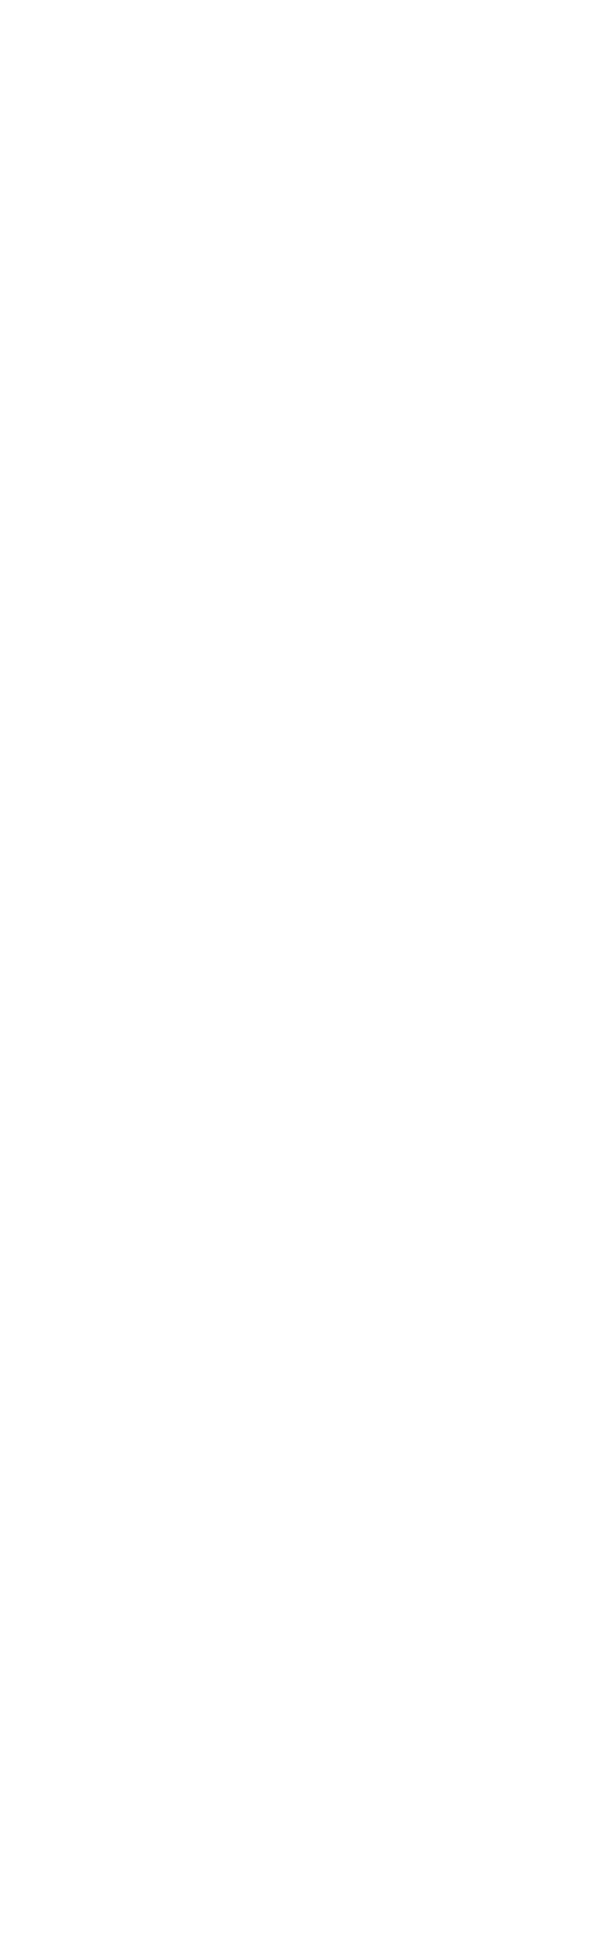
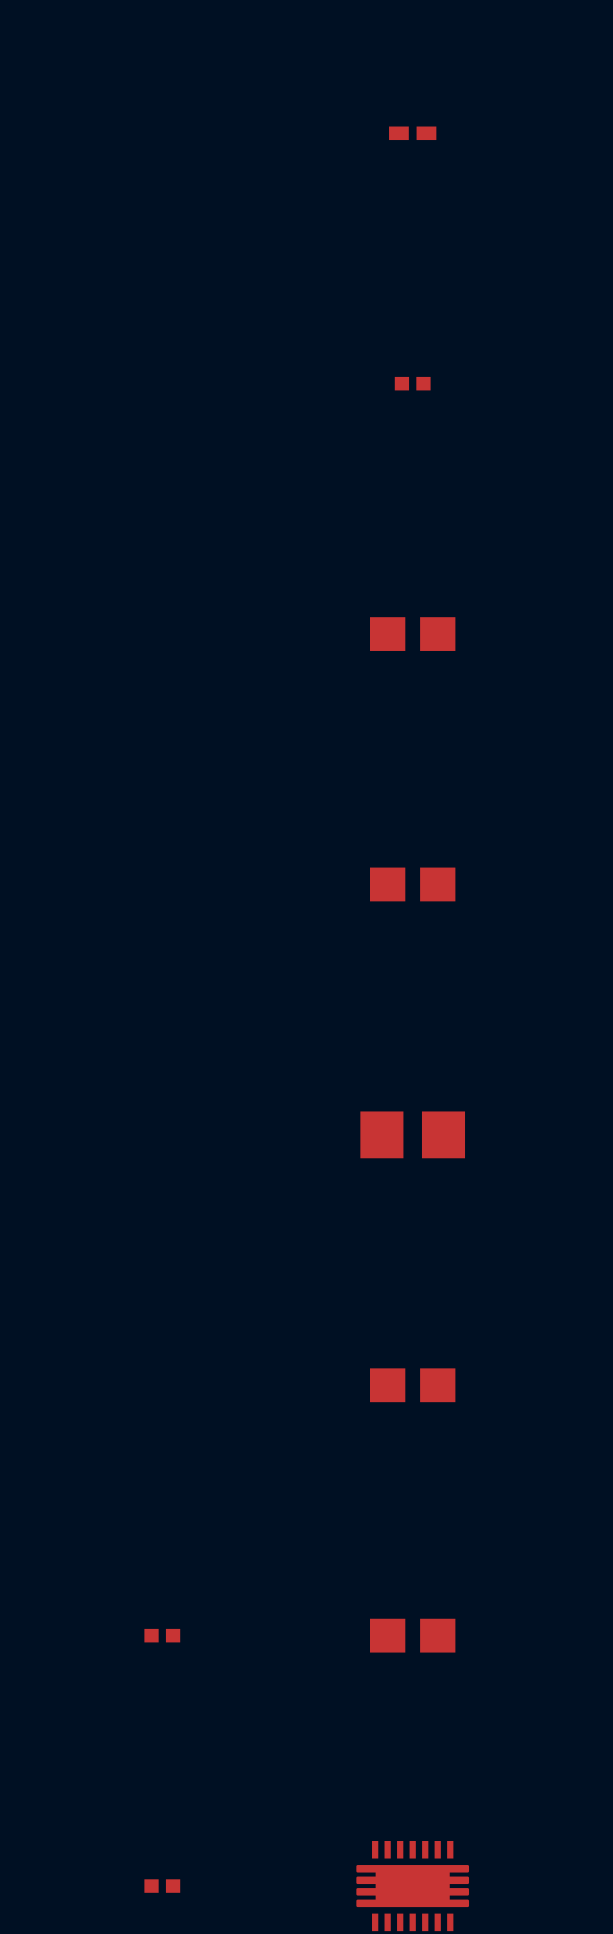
part: none -> (412, 133)
part: none -> (412, 383)
part: none -> (412, 634)
part: none -> (412, 884)
part: none -> (412, 1134)
part: none -> (412, 1385)
part: none -> (162, 1635)
part: none -> (412, 1635)
part: none -> (162, 1886)
part: none -> (412, 1886)

